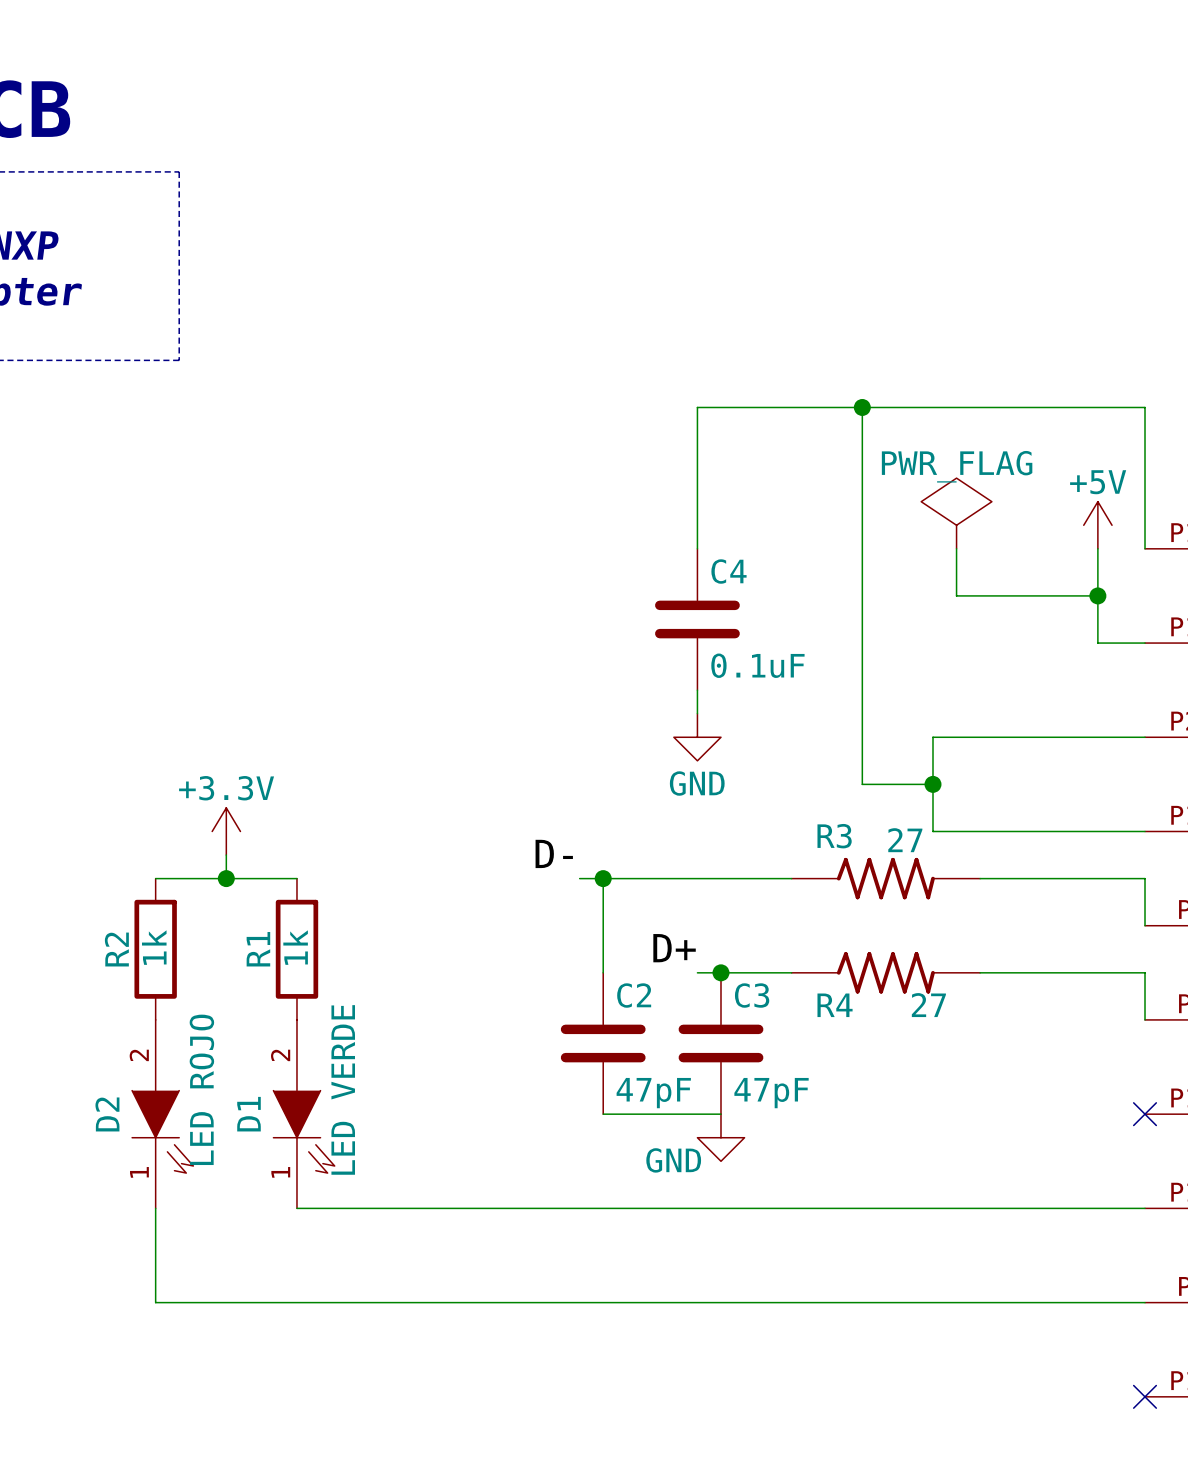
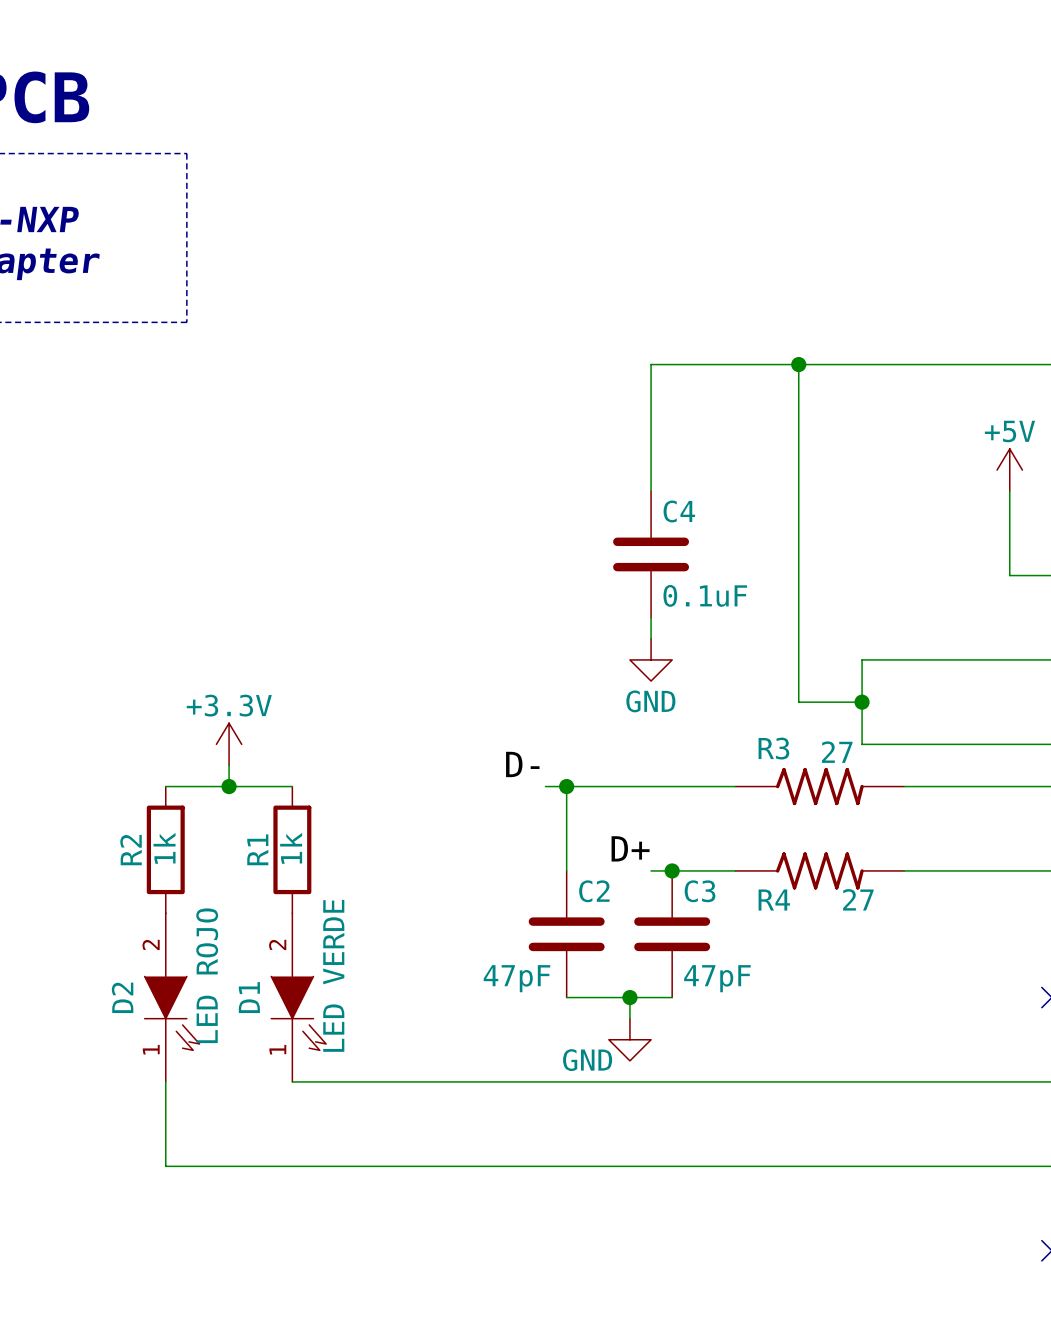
power symbol: PWR_FLAG (956, 513) -> none
wire: (956, 548) (956, 595) (1097, 595) -> none
junction: (1097, 595) -> none
C2 value position: 47pF (653, 1093) -> 47pF (516, 978)
wire: none -> (629, 997) (629, 1018)
junction: none -> (629, 997)
power symbol position: GND (720, 1137) -> GND (629, 1039)

